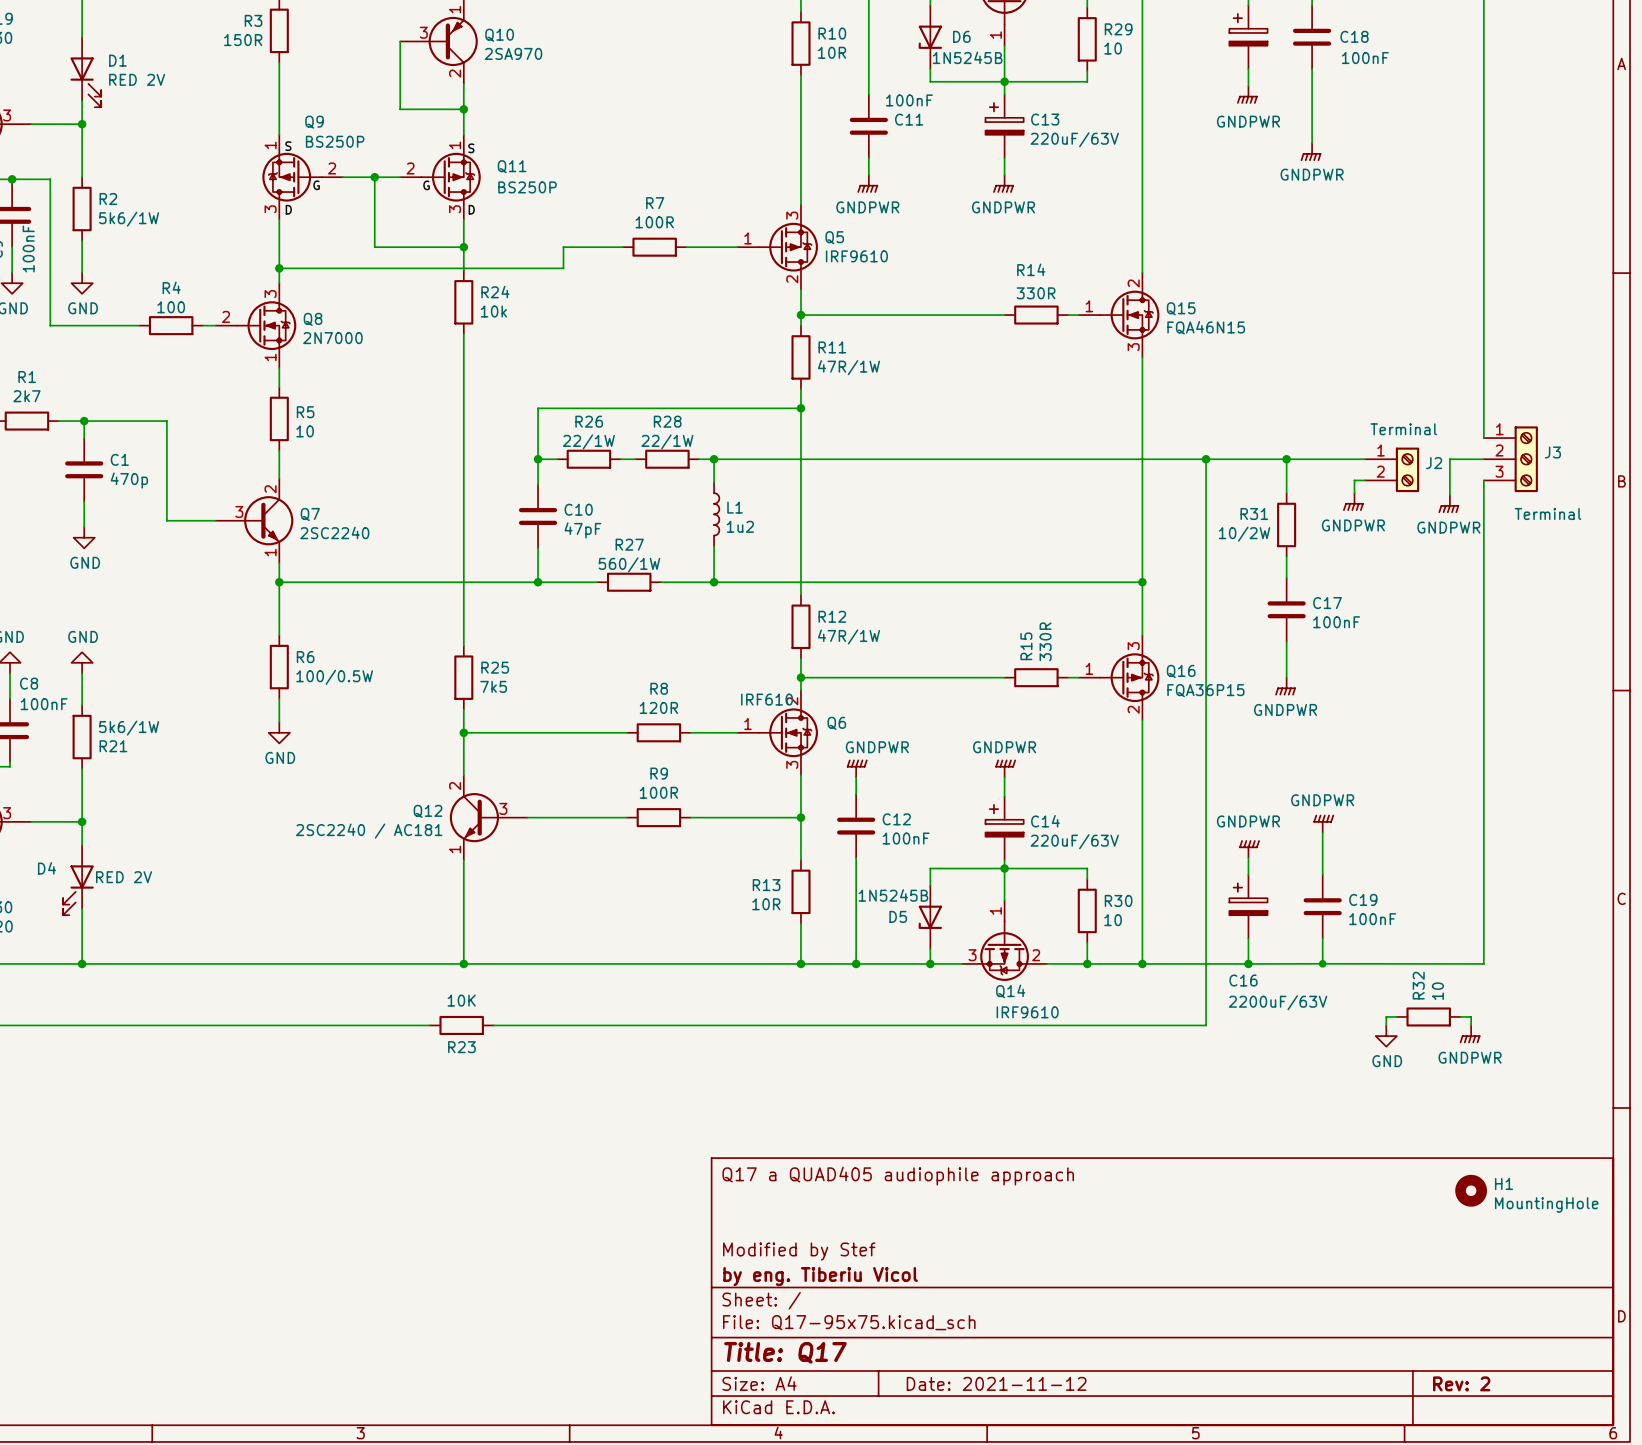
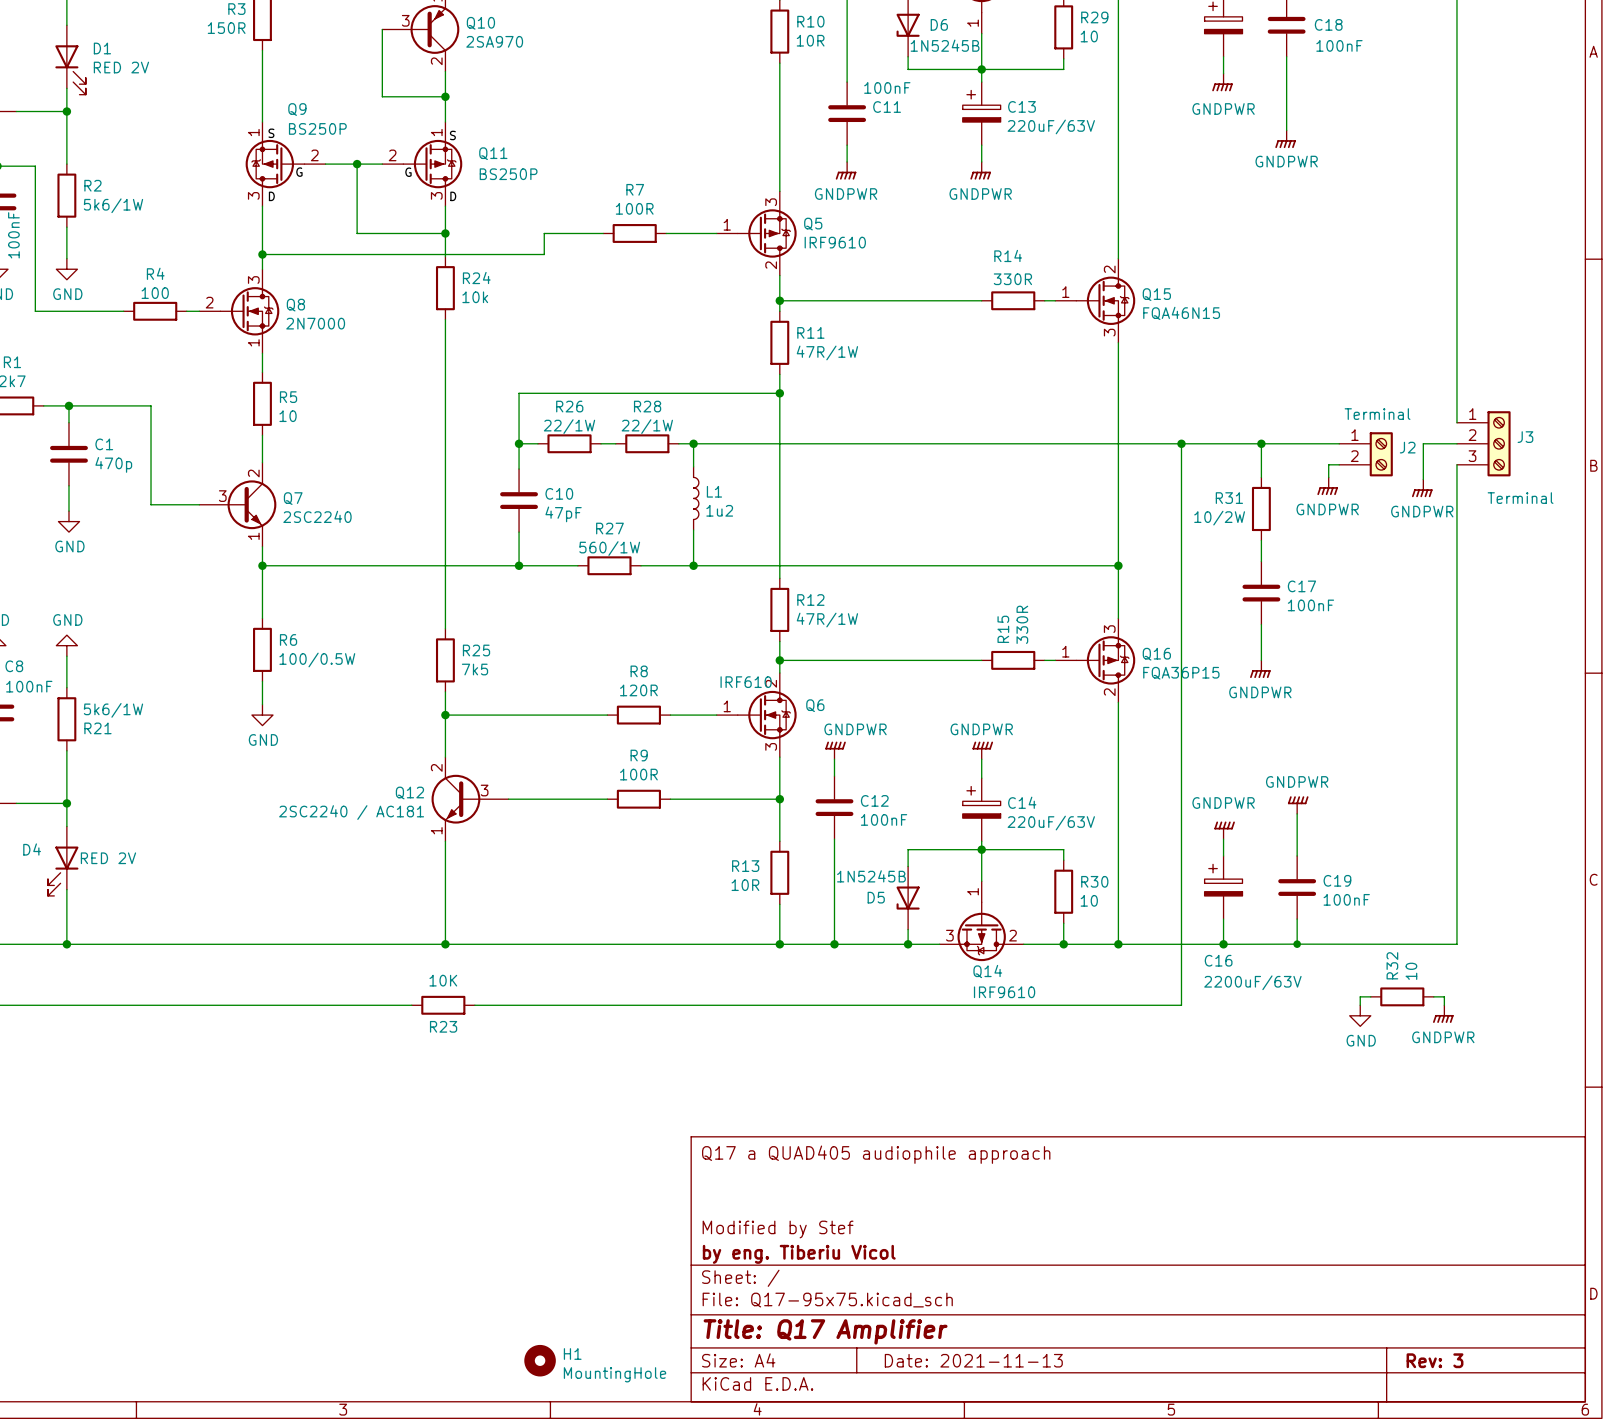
H1 position: (1471, 1190) -> (540, 1360)
title block: Title: Q17 (785, 1352) -> Title: Q17 Amplifier (825, 1331)
title block: Date: 2021-11-12 (996, 1383) -> Date: 2021-11-13 (973, 1360)
title block: Rev: 2 (1461, 1383) -> Rev: 3 (1435, 1360)

